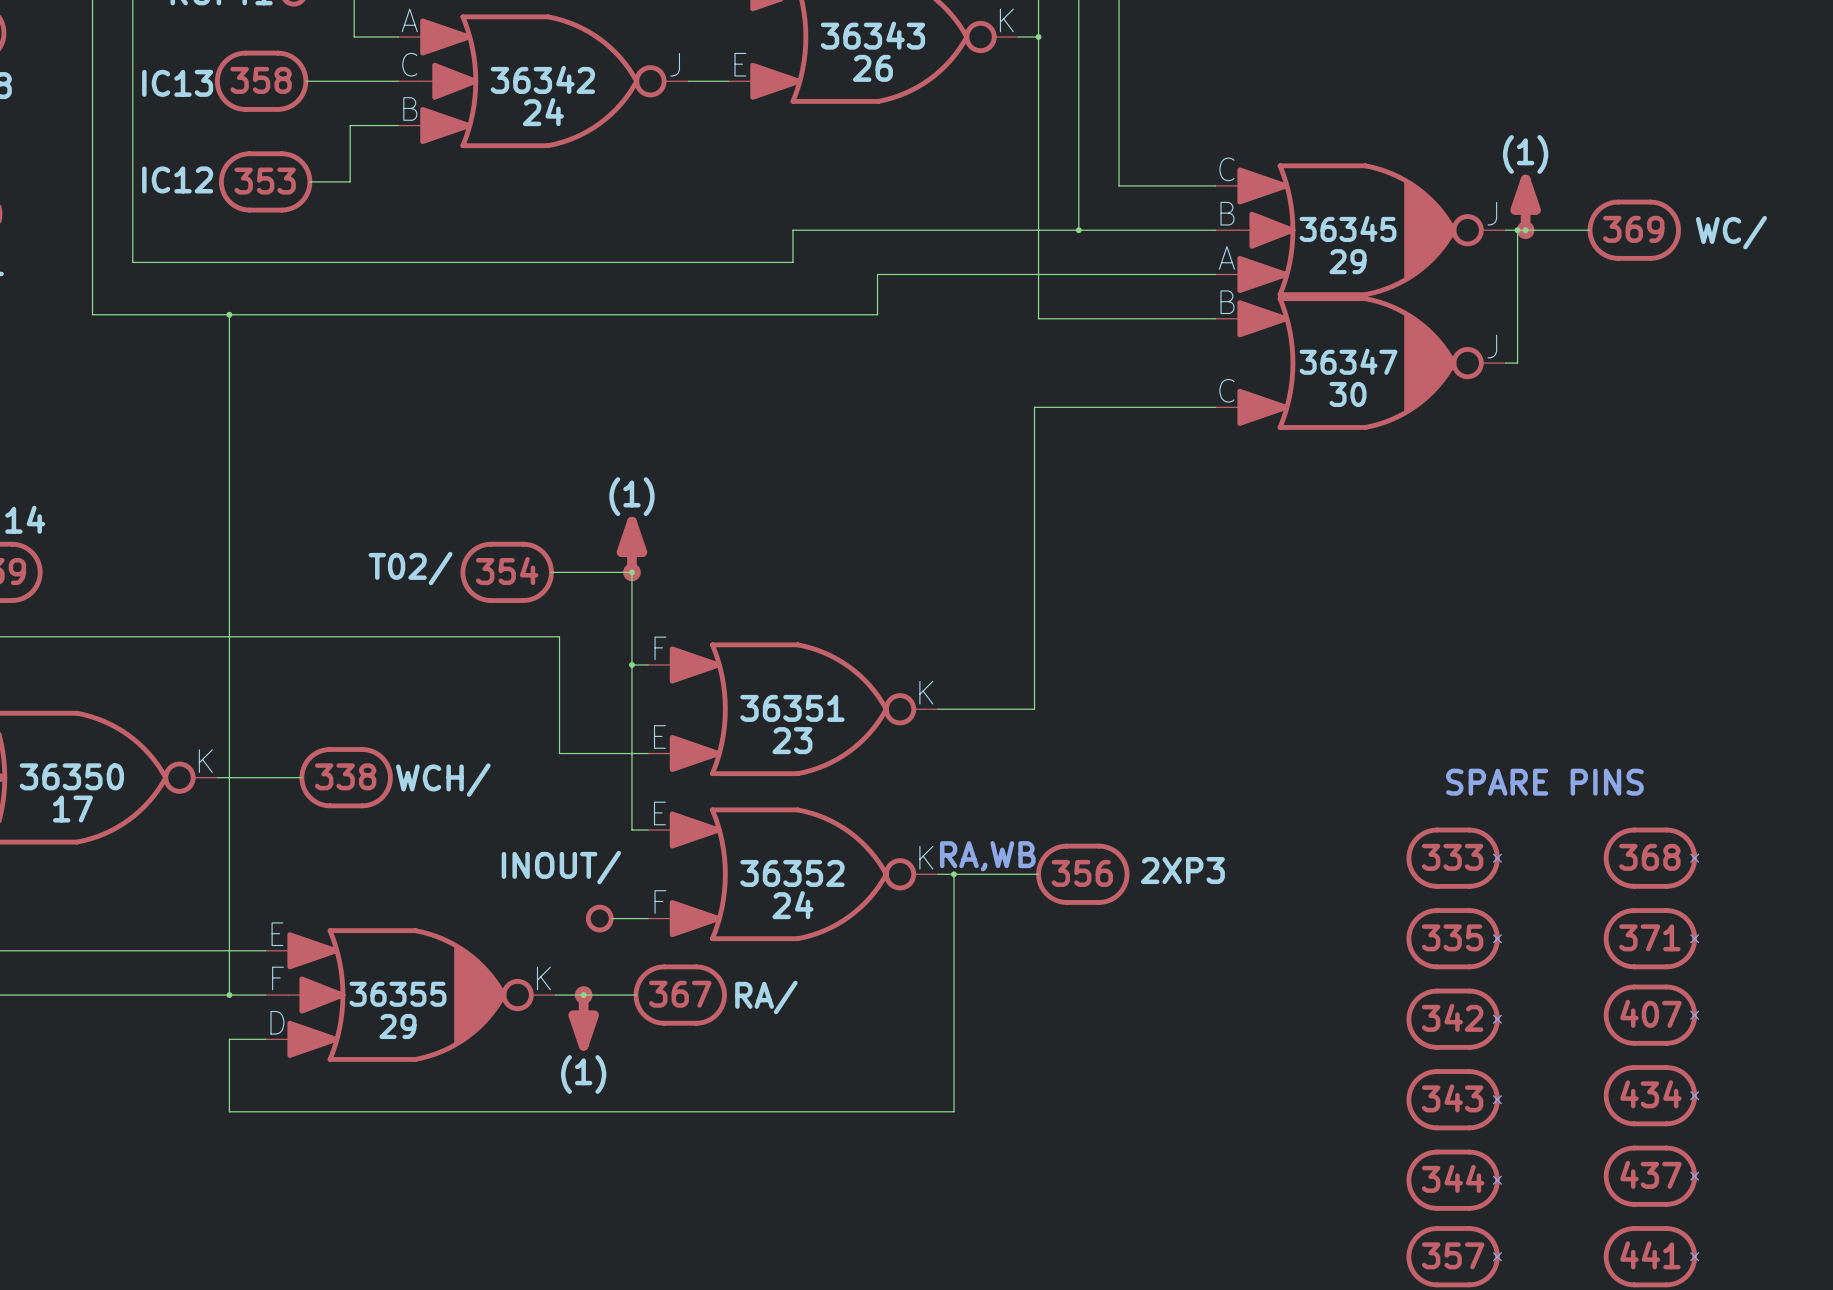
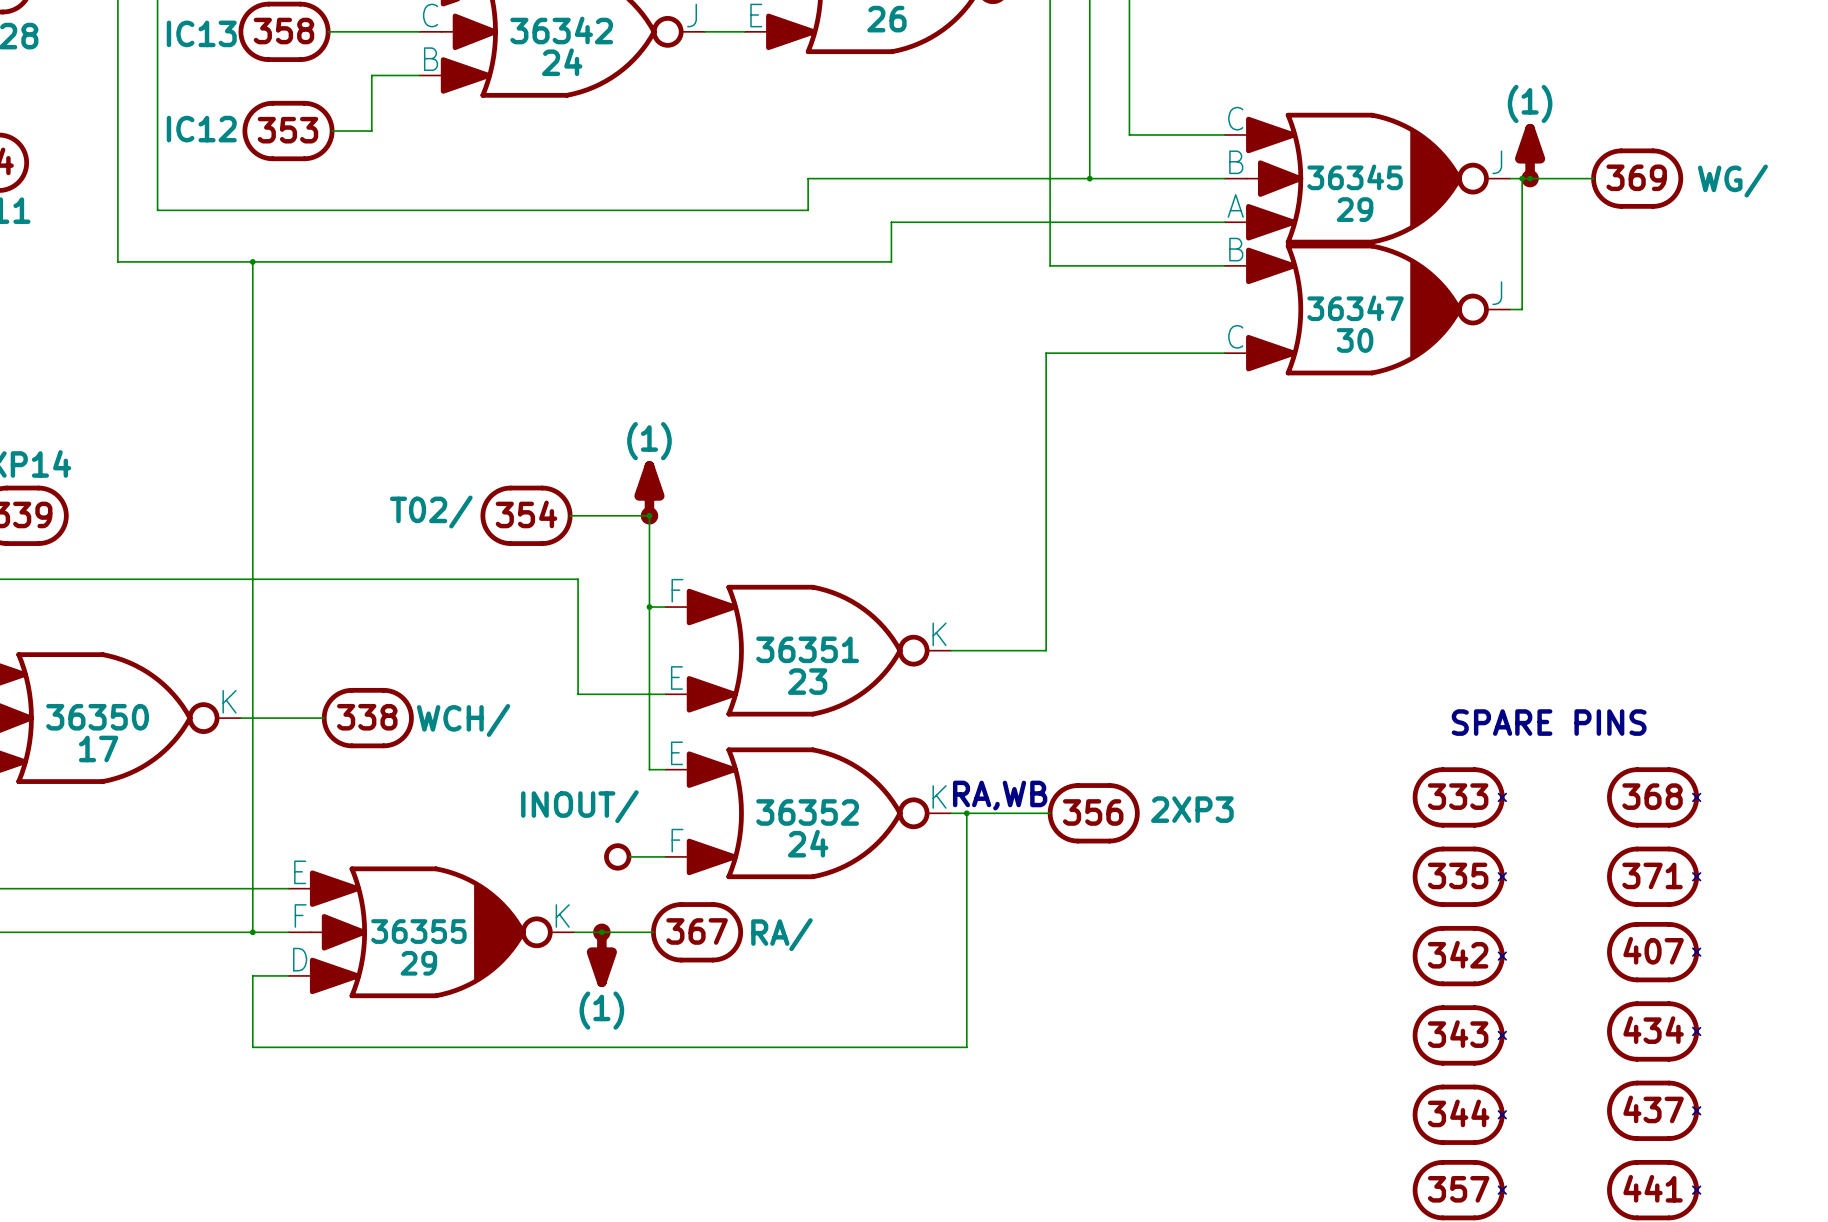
part text: WC/ (1731, 232) -> WG/ (1732, 181)

